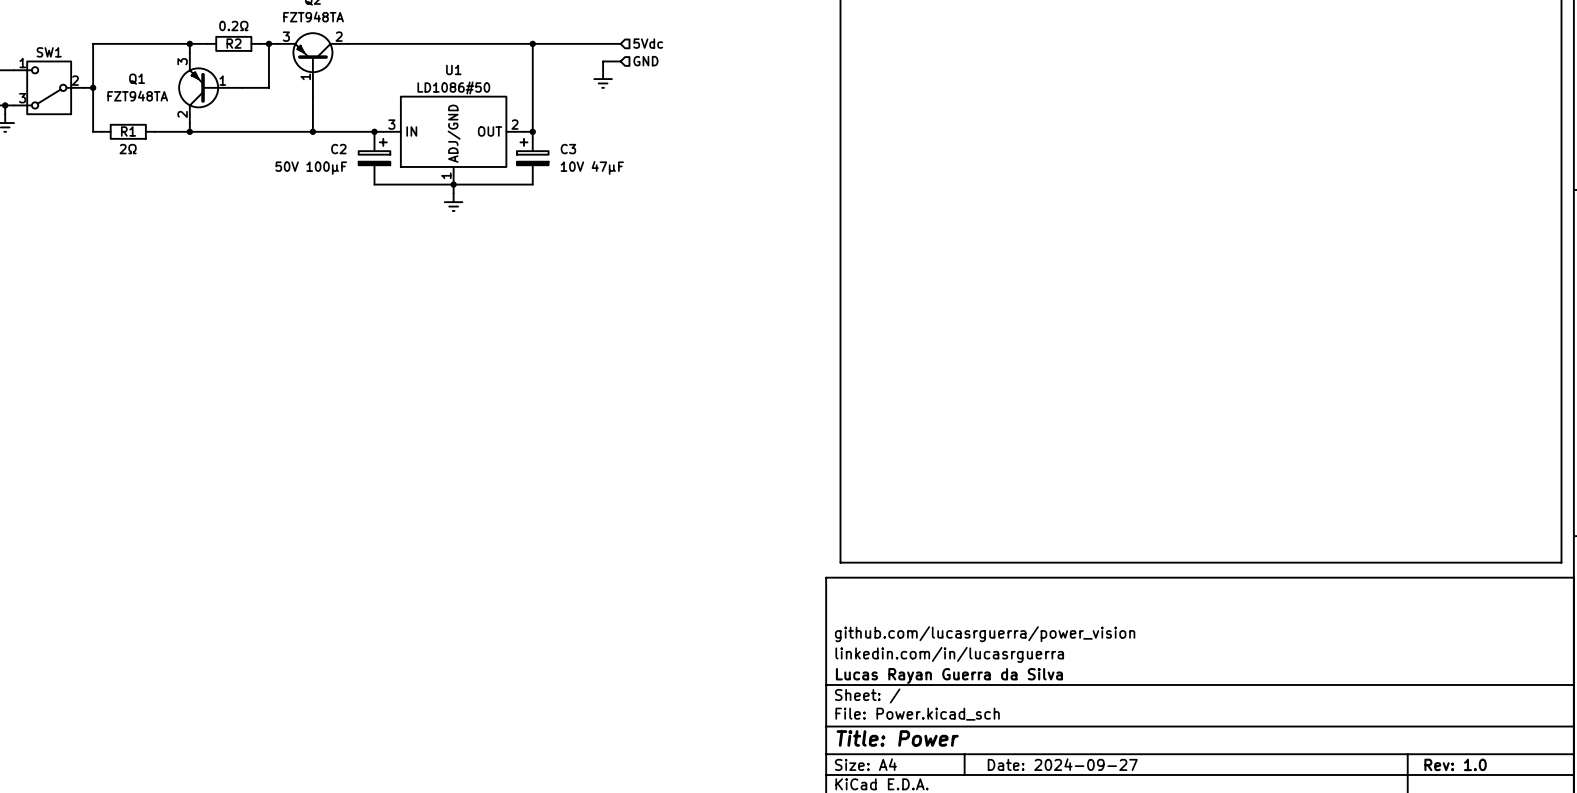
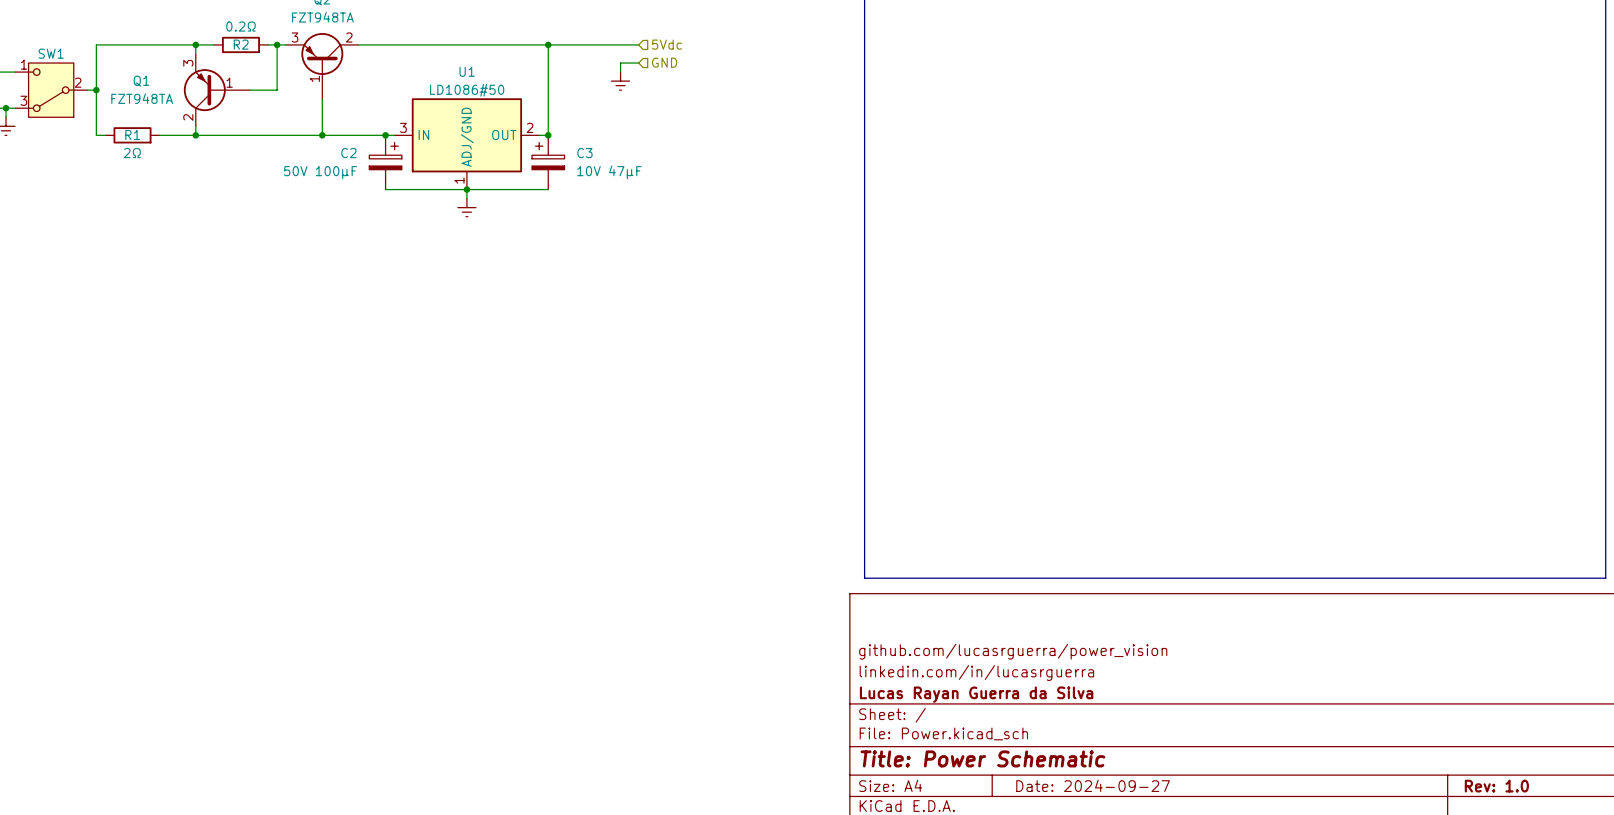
title block: Title: Power (897, 738) -> Title: Power Schematic (982, 758)

